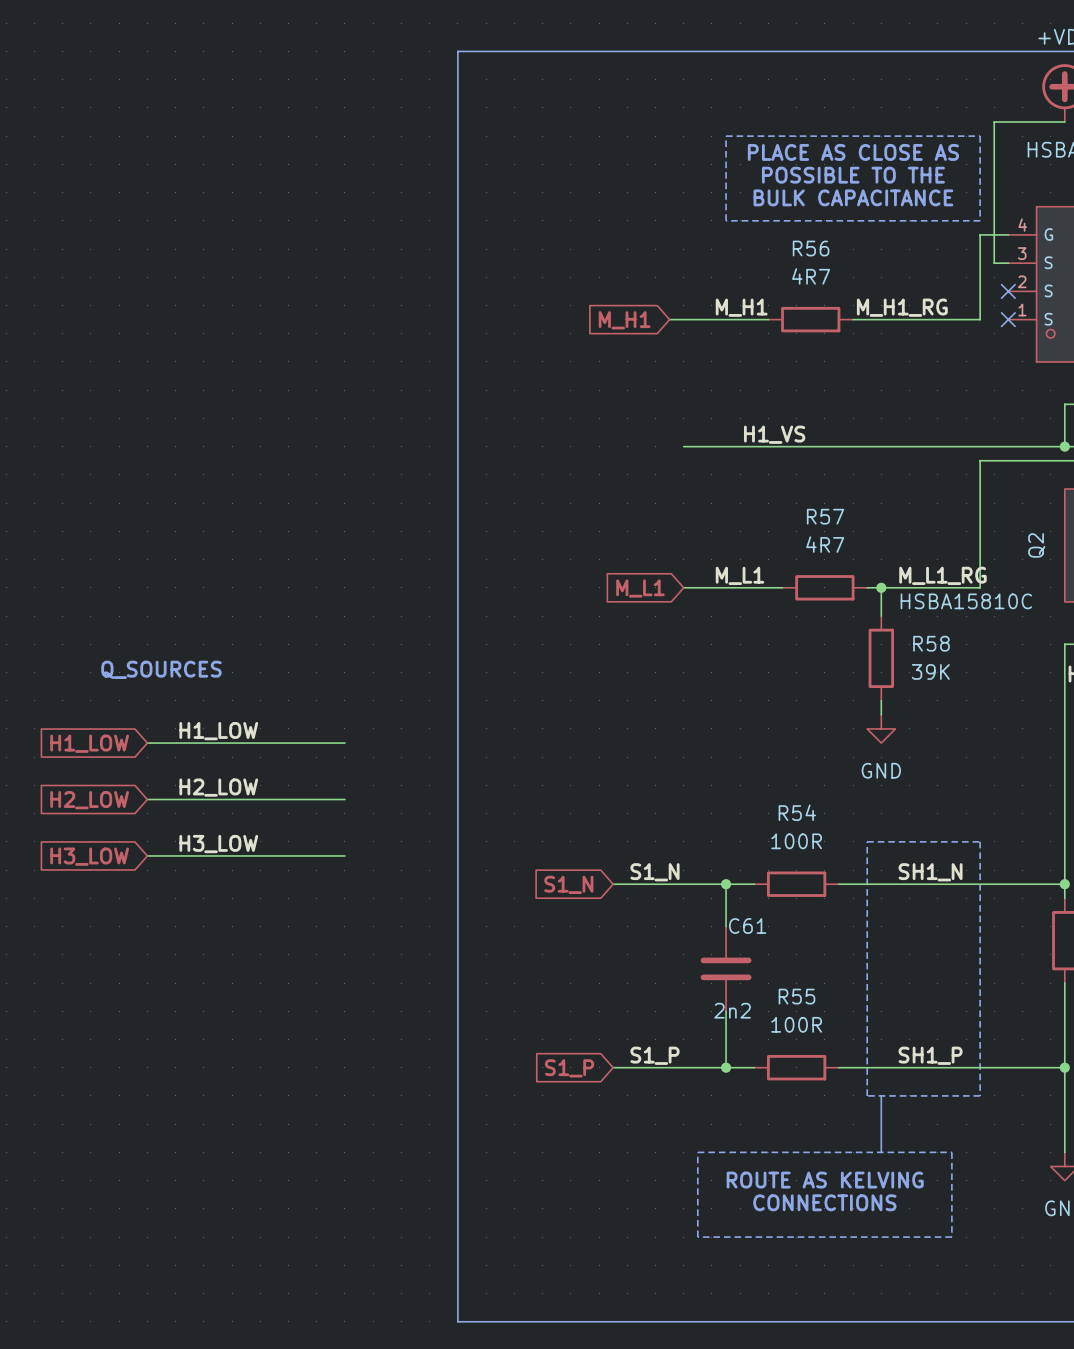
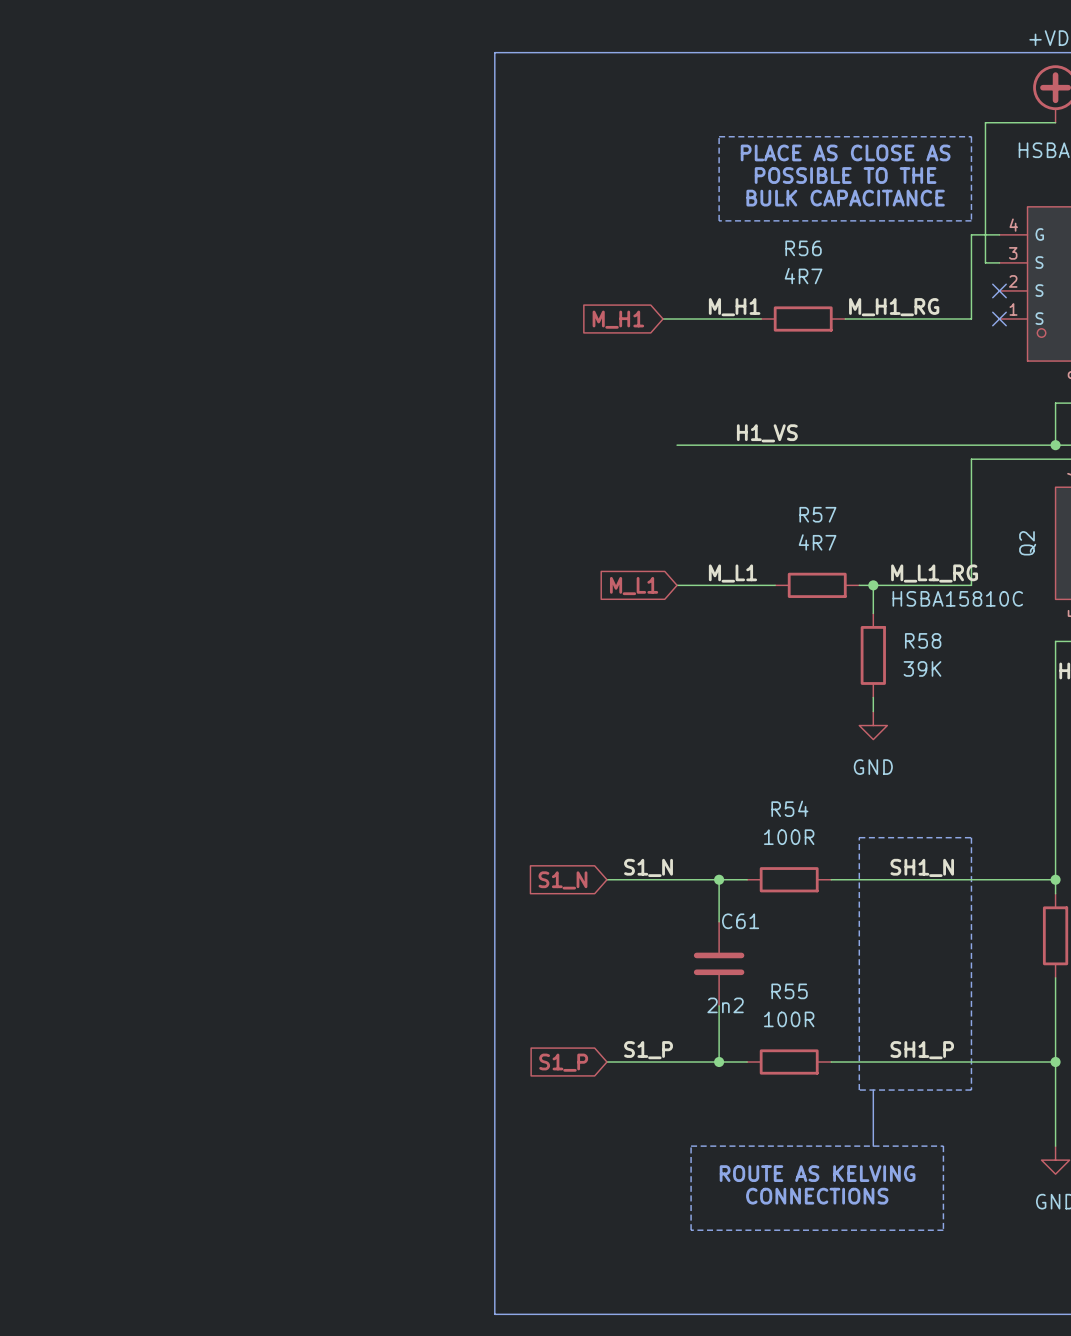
line: (500, 51) (457, 51) (457, 1321) (500, 1321) -> (494, 52) (494, 1314)
text: Q_SOURCES (161, 669) -> none
label: H1_LOW (218, 731) -> none
global label: H1_LOW (89, 743) -> none
wire: (147, 743) (344, 743) -> none
label: H2_LOW (218, 787) -> none
wire: (147, 799) (344, 799) -> none
global label: H2_LOW (89, 800) -> none
label: H3_LOW (218, 844) -> none
wire: (147, 855) (344, 855) -> none
global label: H3_LOW (89, 856) -> none

